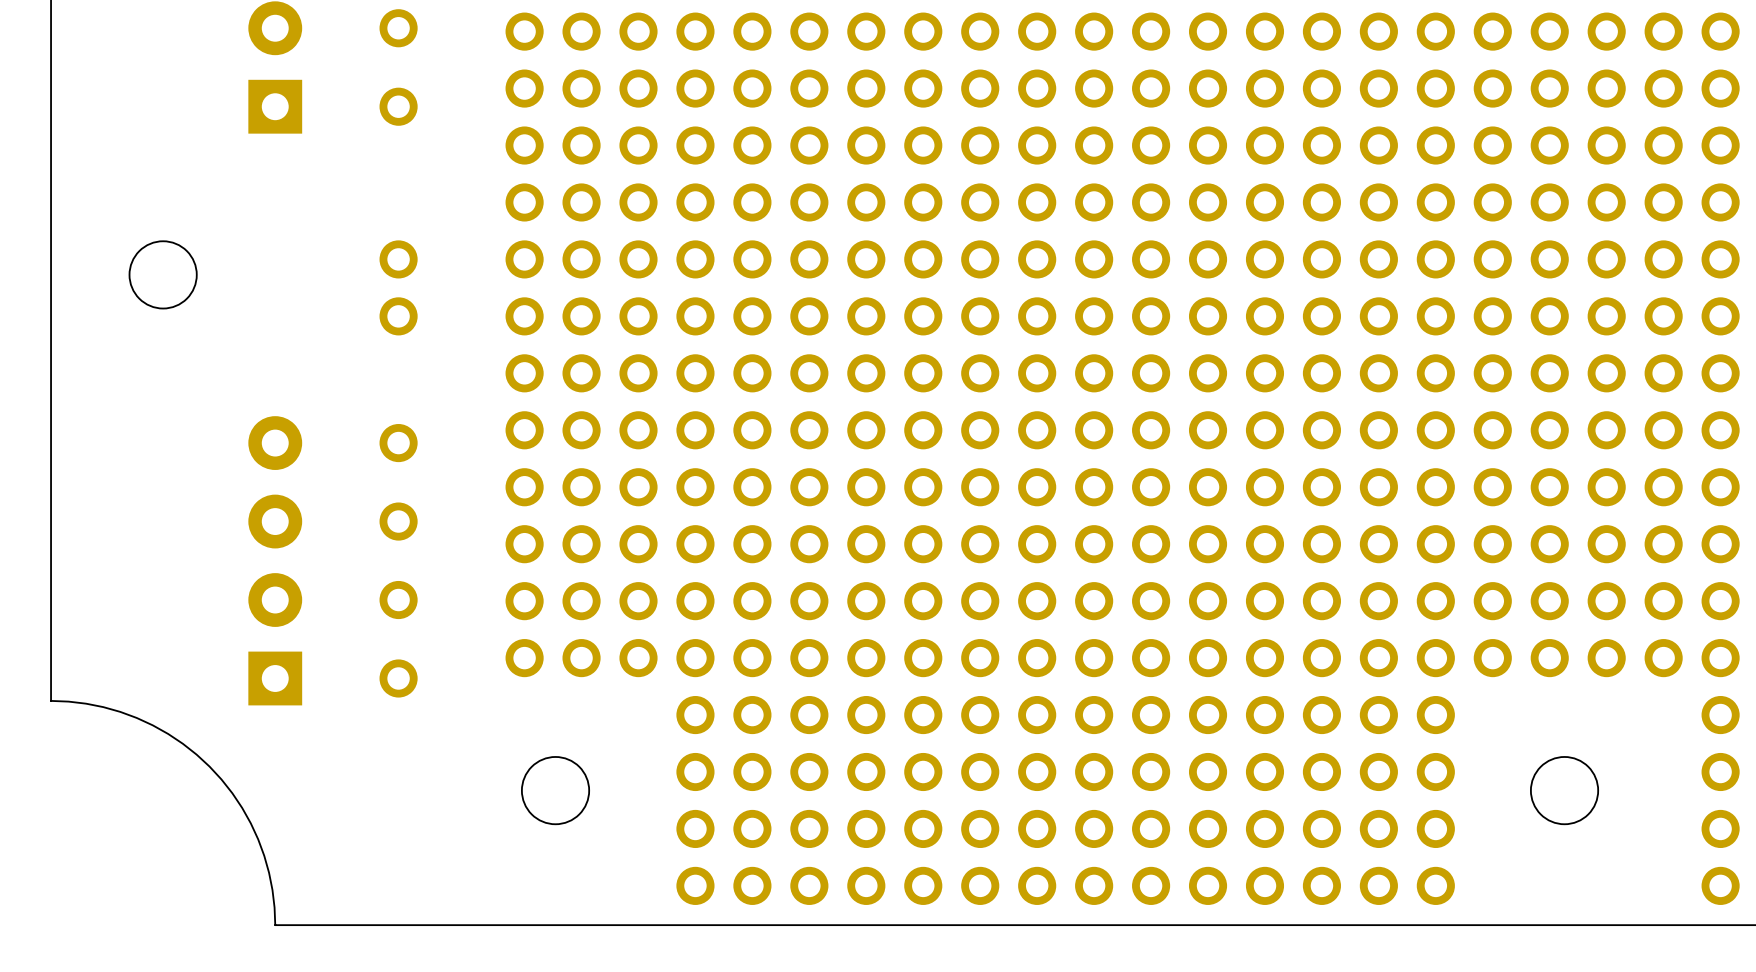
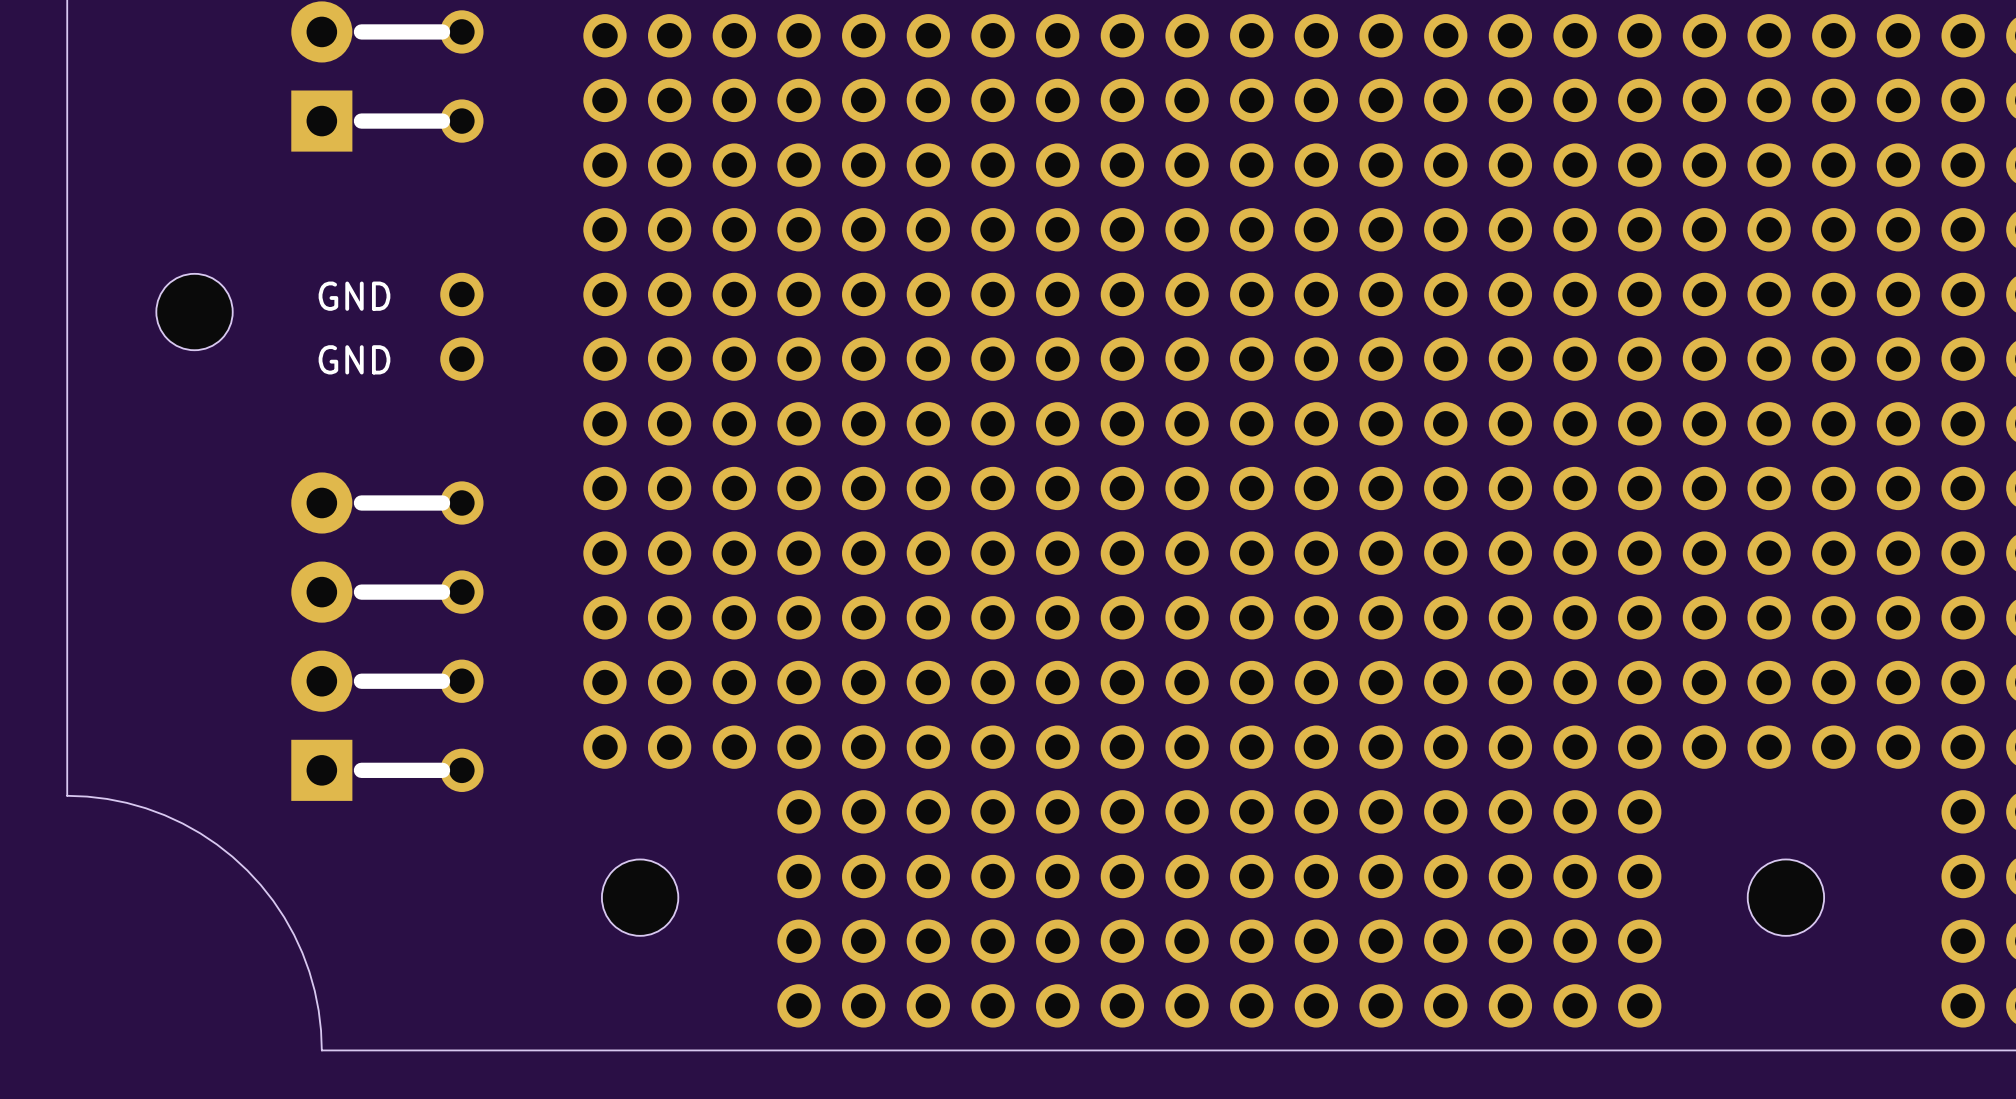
line: none -> (442, 31) (361, 31)
line: none -> (442, 121) (361, 121)
text: none -> GND (354, 296)
text: none -> GND (354, 359)
line: none -> (442, 502) (361, 502)
line: none -> (442, 592) (361, 592)
line: none -> (442, 681) (361, 681)
line: none -> (442, 770) (361, 770)

